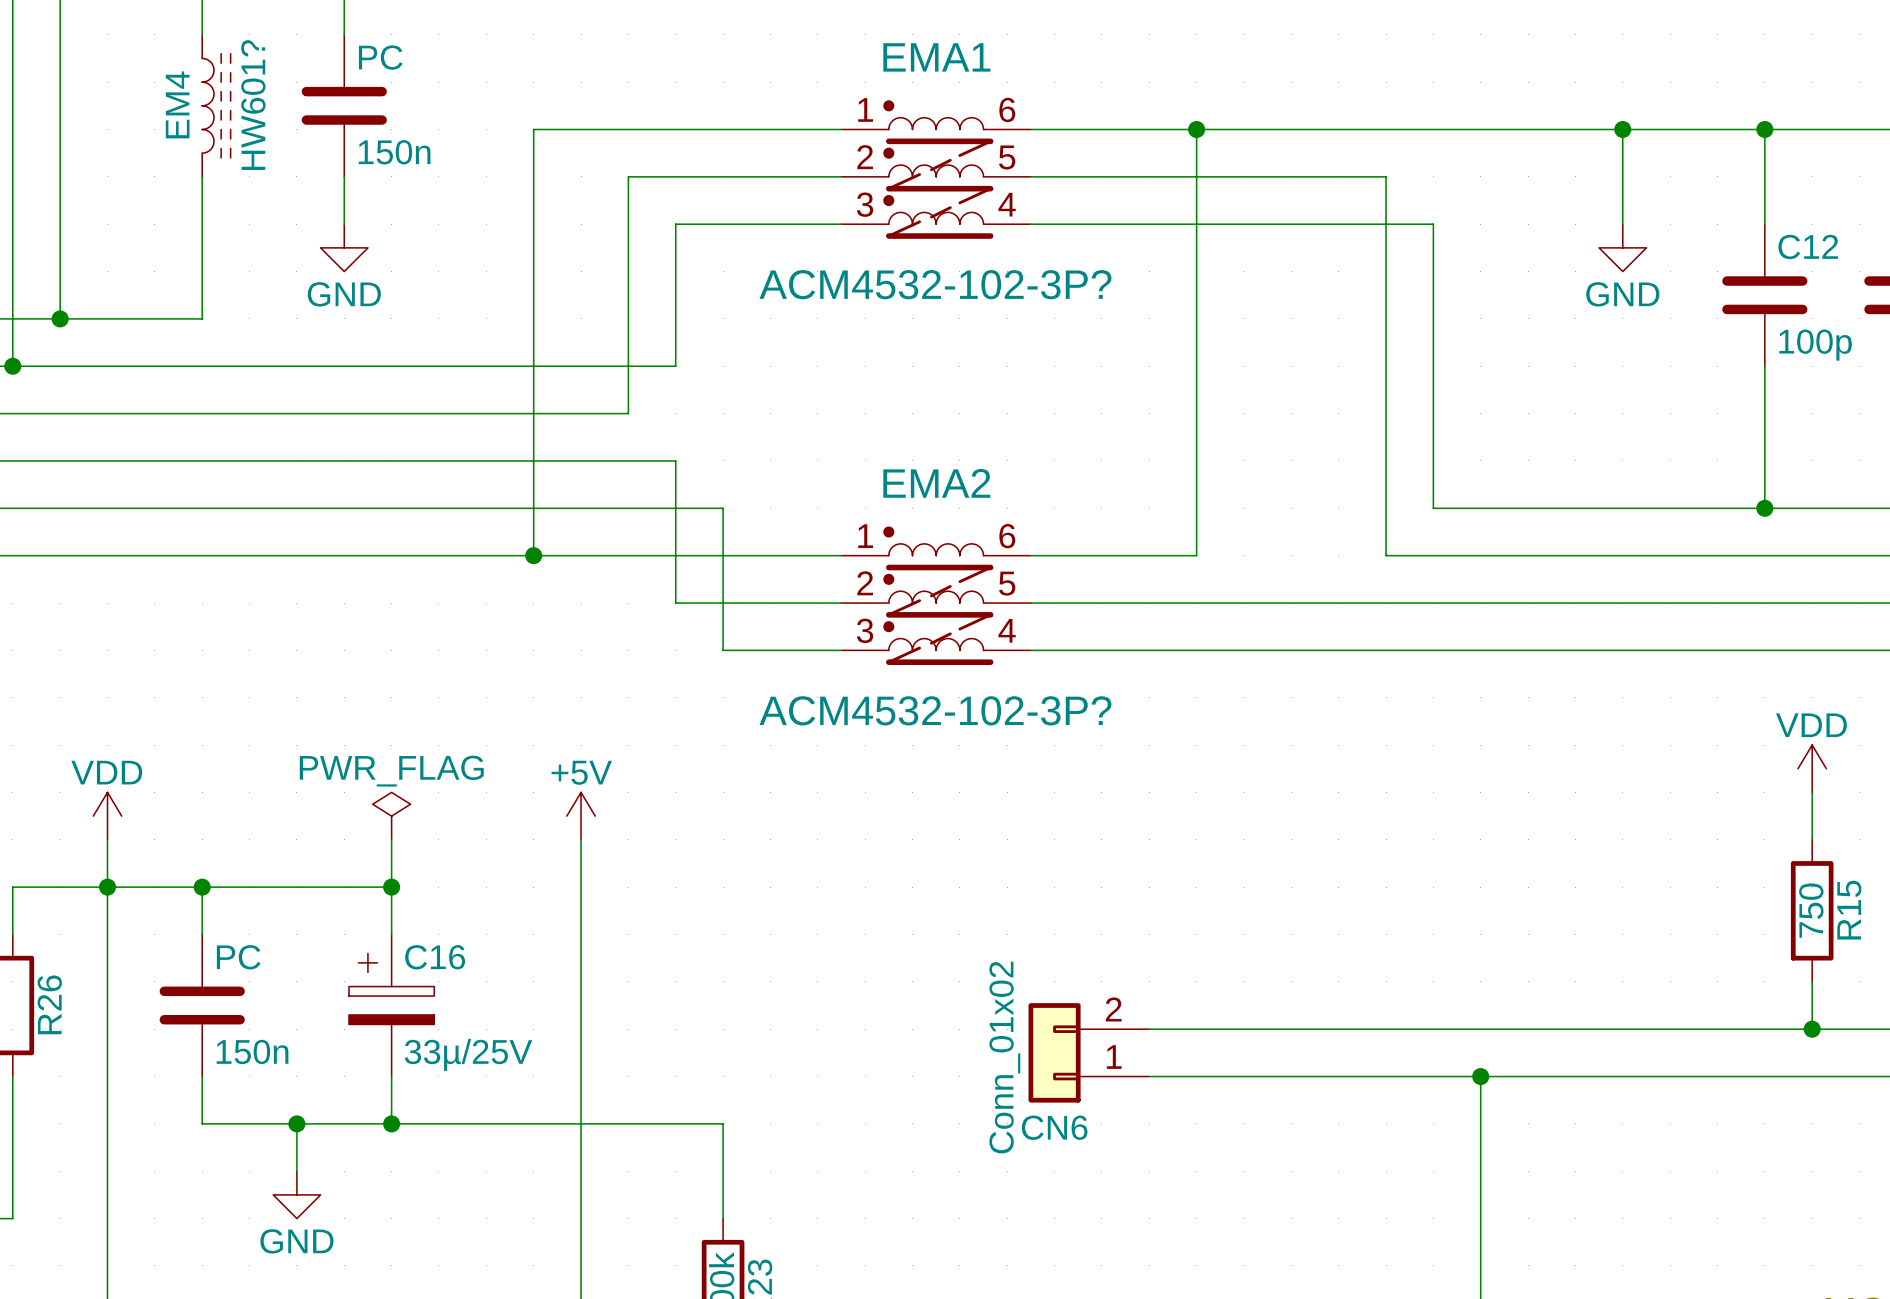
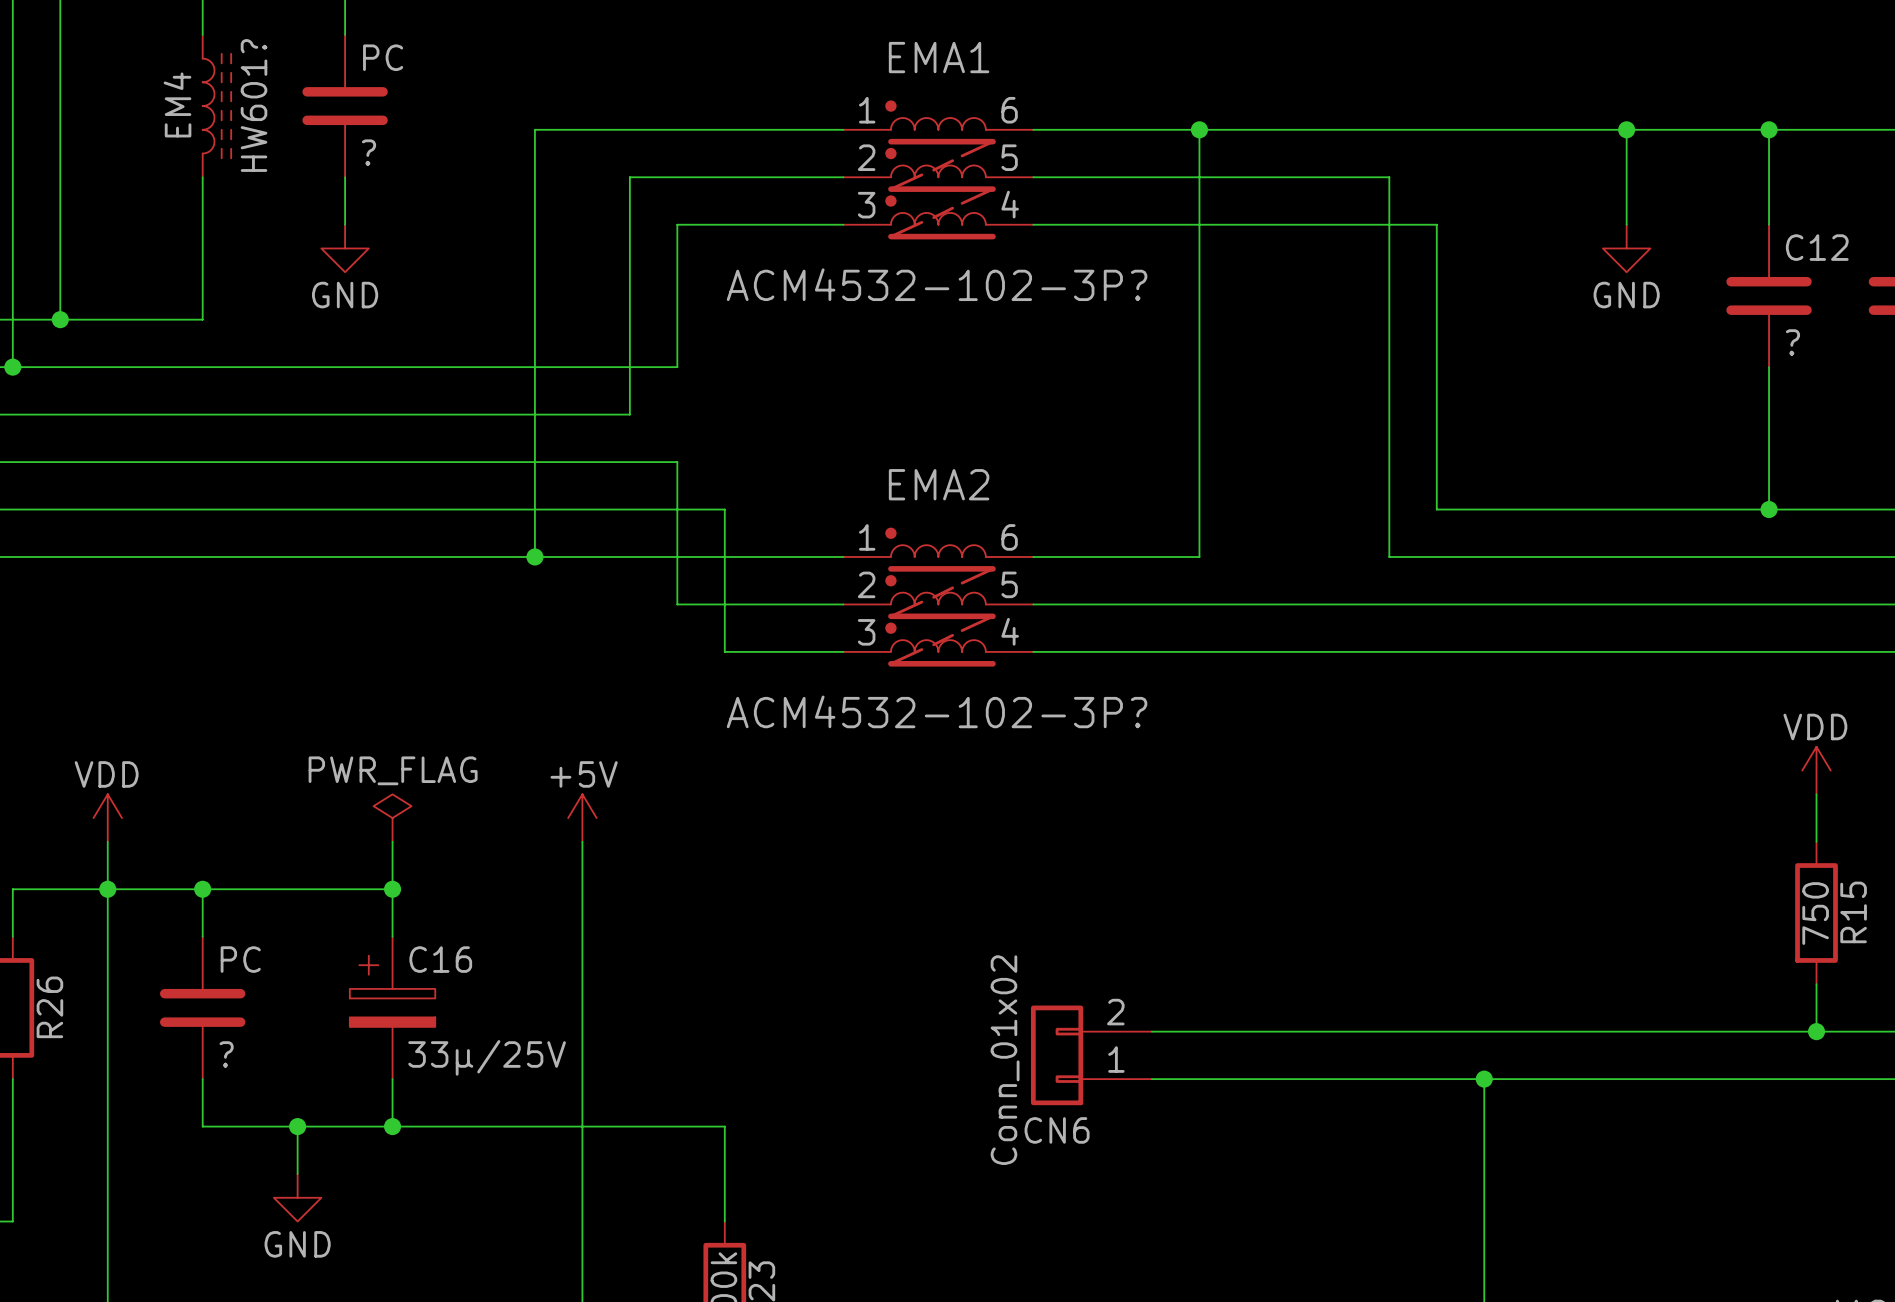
PC value: 150n (394, 152) -> ? (368, 152)
C12 value: 100p (1815, 345) -> ? (1792, 342)
PC value: 150n (252, 1051) -> ? (226, 1054)

